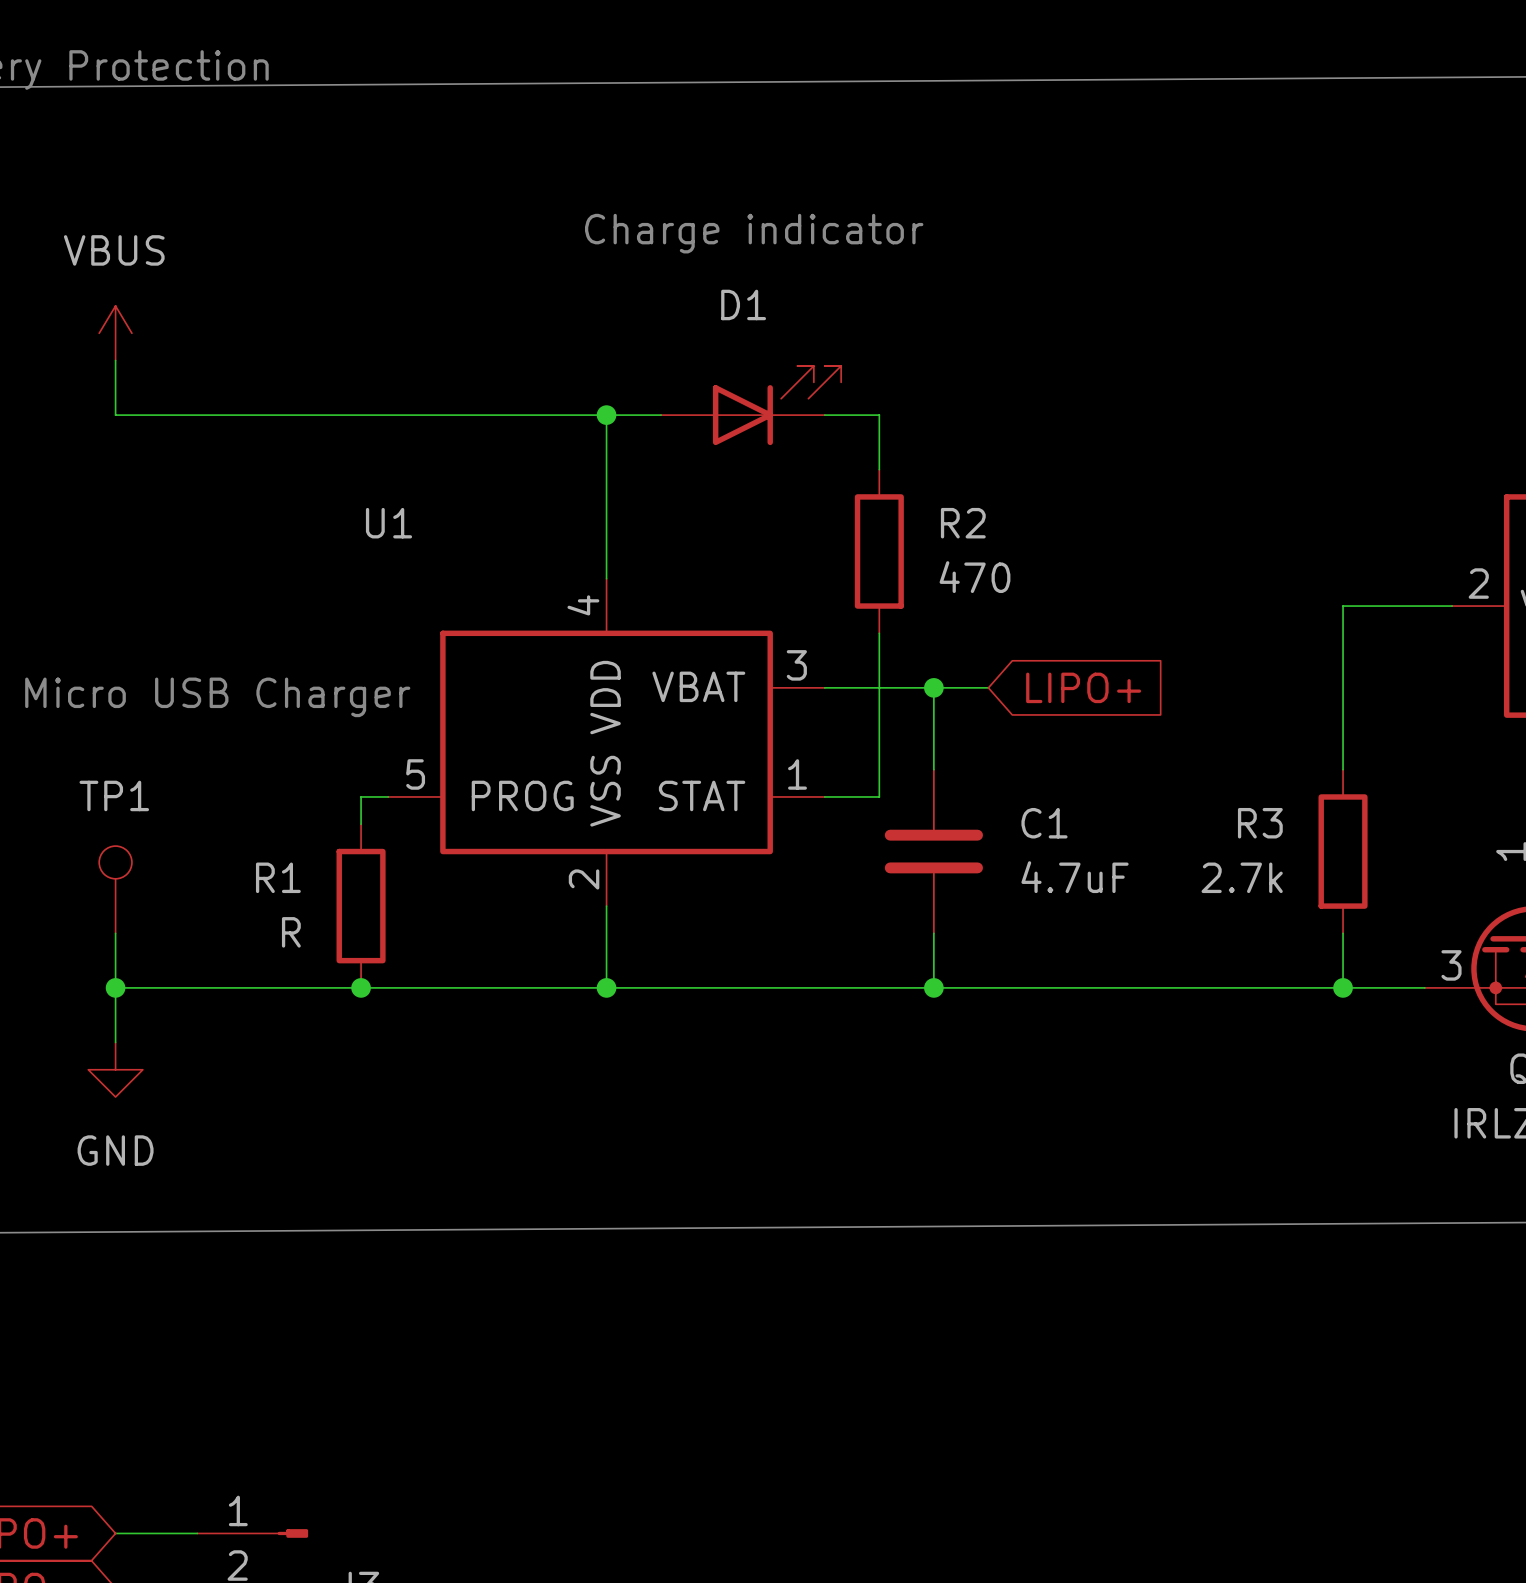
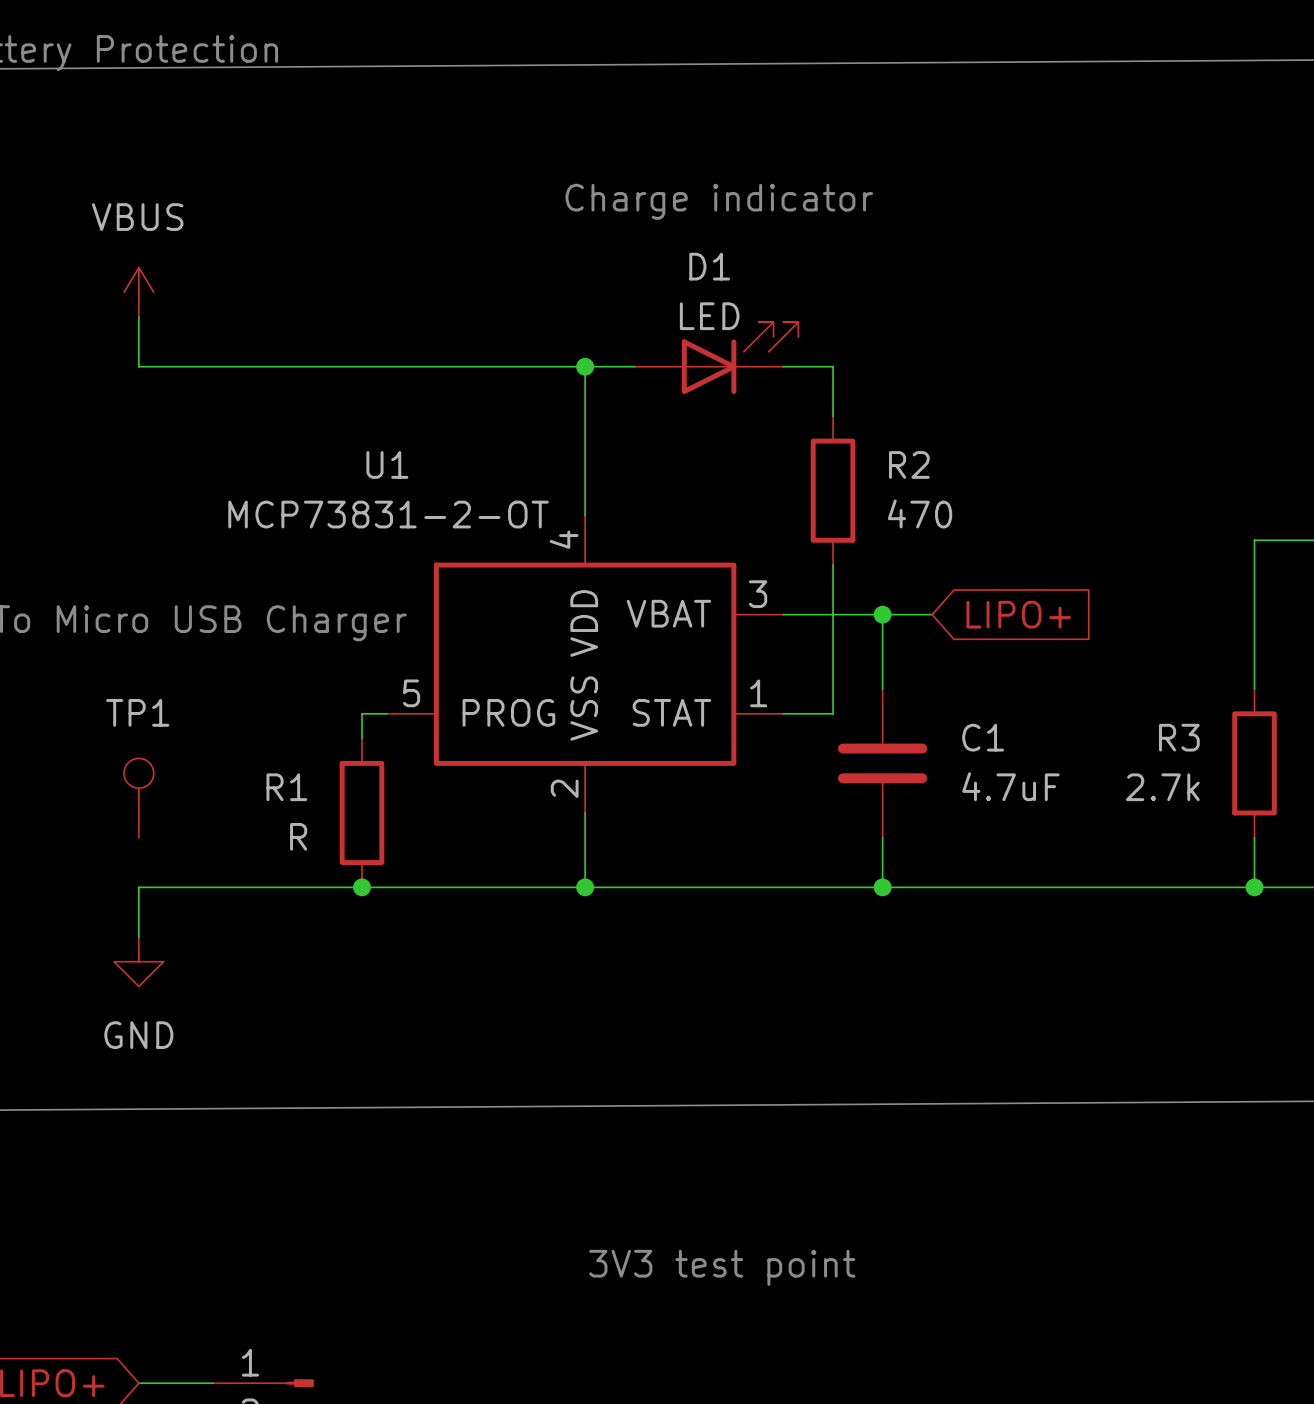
D1 value: none -> LED (709, 316)
U1 value: none -> MCP73831-2-OT (388, 514)
wire: (115, 933) (115, 987) -> none
junction: (115, 987) -> none
text: none -> 3V3 test point (722, 1267)

